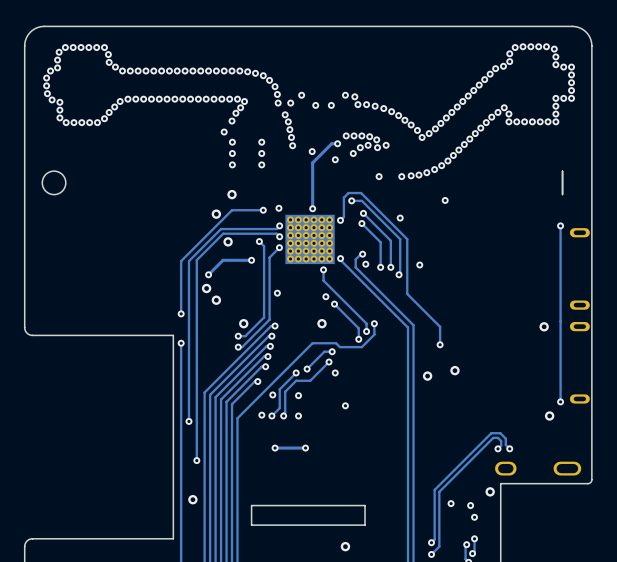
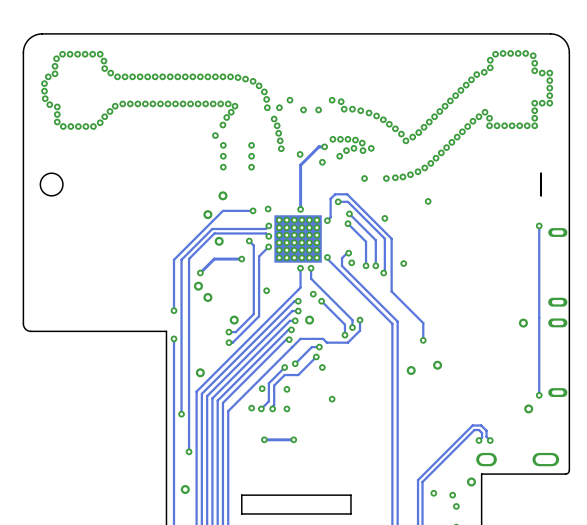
via: none -> (300, 268)
via: none -> (298, 301)
via: none -> (298, 311)
via: none -> (295, 320)
track: (275, 326) (271, 326) (204, 392) (204, 397) -> (300, 268) (300, 287) (196, 391)
via: (275, 326) -> none
via: none -> (291, 329)
track: (271, 336) (268, 336) (210, 394) (210, 400) -> (298, 301) (294, 301) (201, 393)
via: (271, 336) -> none
via: none -> (289, 339)
track: (270, 346) (266, 346) (215, 397) (215, 402) -> (298, 311) (292, 311) (207, 396)
via: (270, 346) -> none
track: (268, 356) (264, 356) (221, 399) (221, 405) -> (295, 320) (289, 320) (212, 398)
via: (268, 356) -> none
track: (265, 366) (261, 366) (226, 401) (226, 407) -> (291, 329) (288, 329) (217, 400)
via: (265, 366) -> none
via: none -> (200, 372)
track: (257, 381) (254, 381) (232, 404) (232, 409) -> (289, 339) (286, 339) (222, 402)
via: (257, 381) -> none

